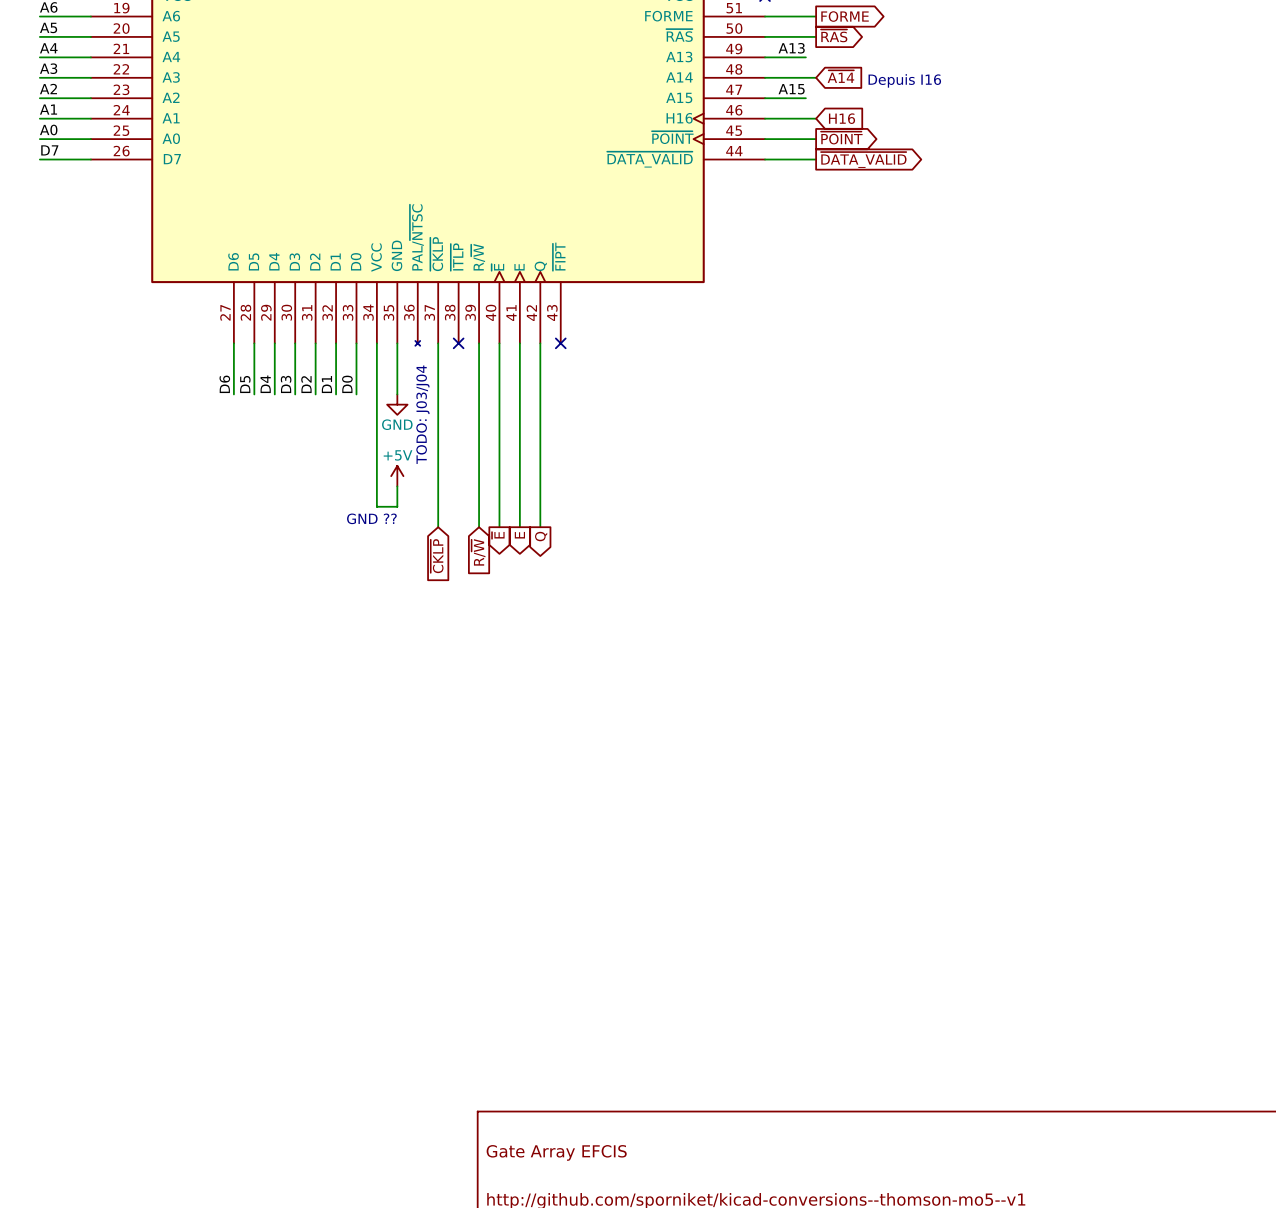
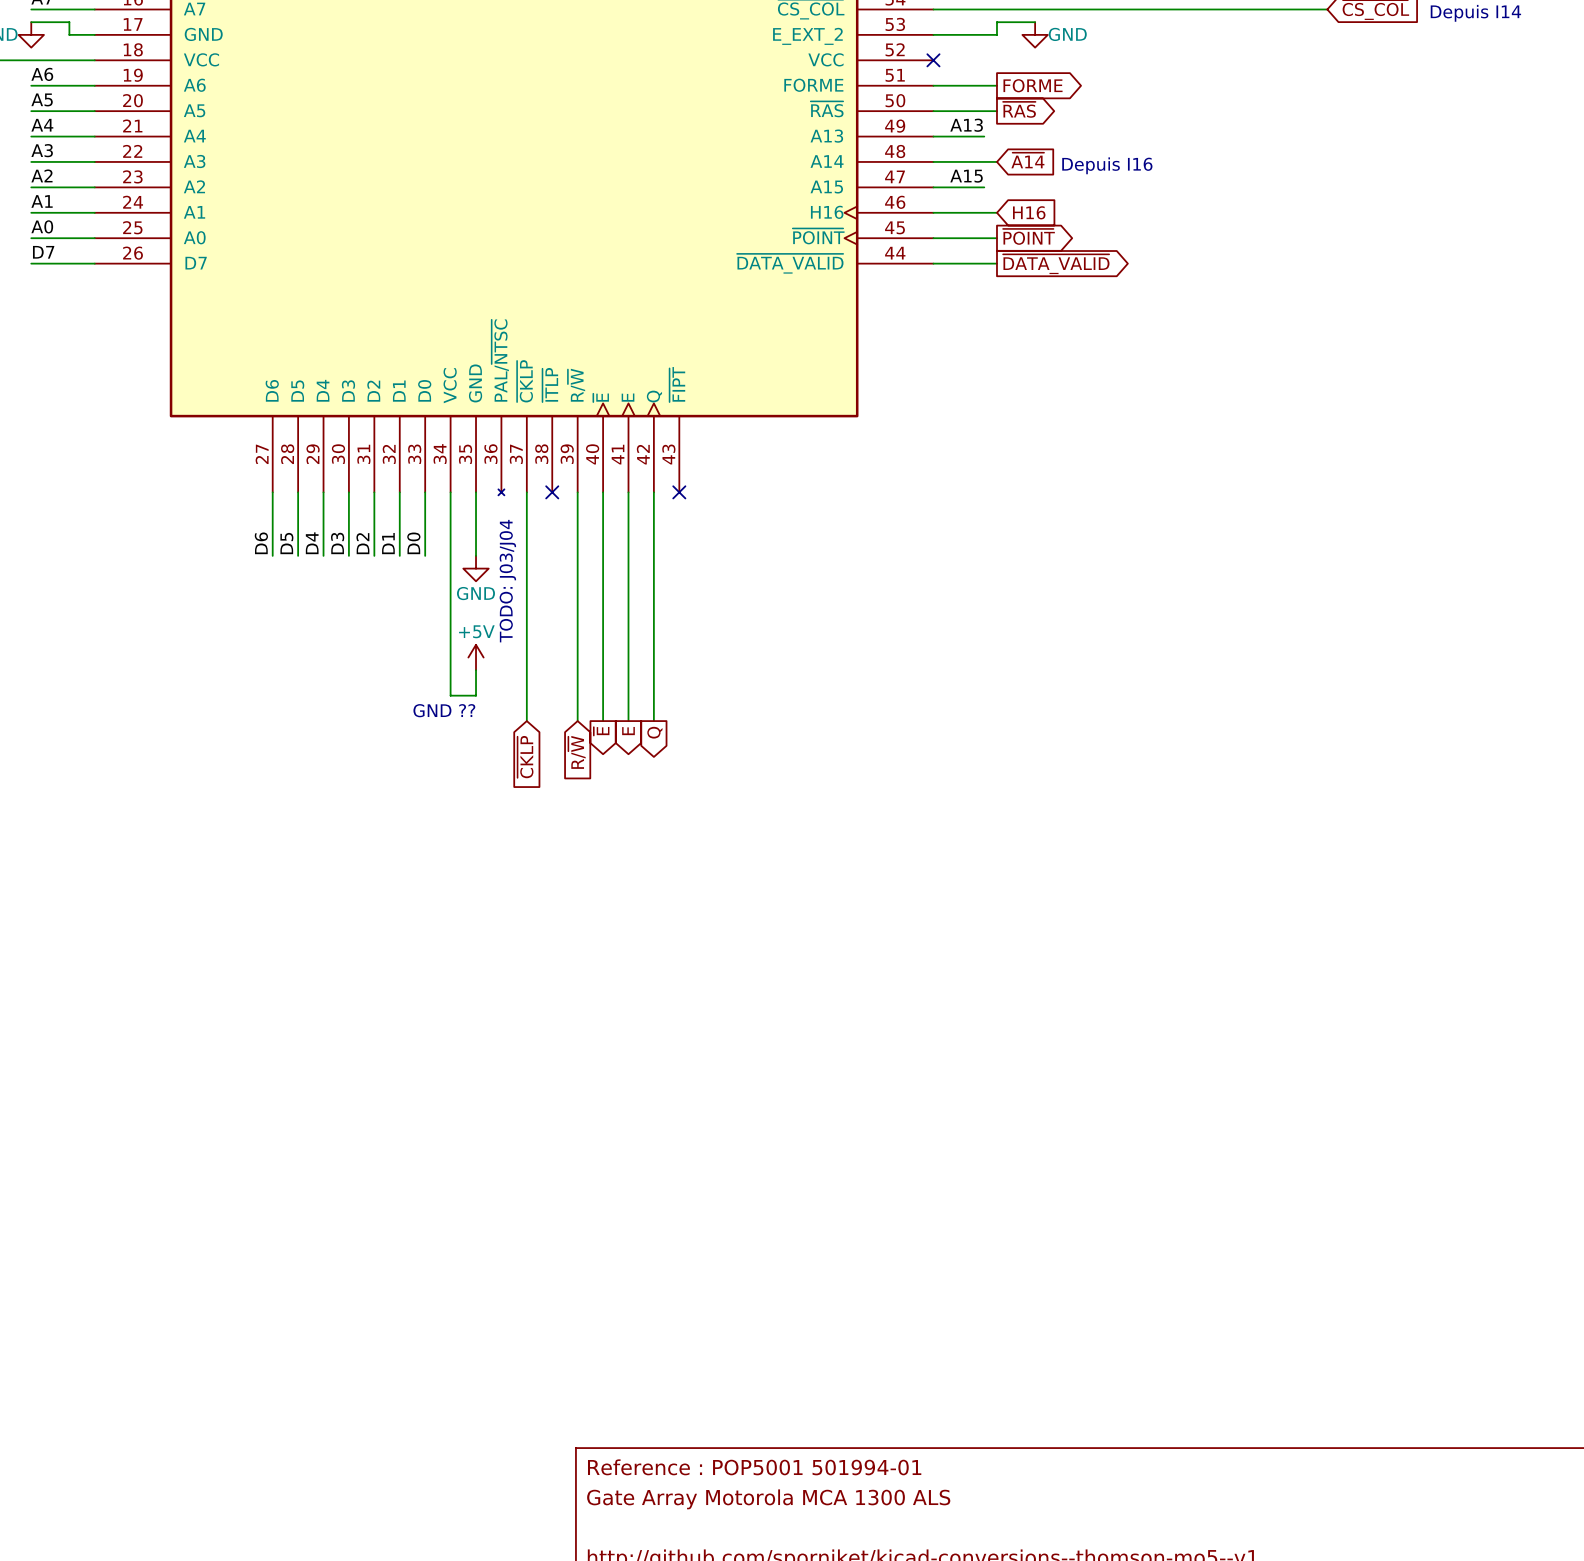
title block: none -> Reference : POP5001 501994-01 (754, 1467)
title block: Gate Array EFCIS (556, 1152) -> Gate Array Motorola MCA 1300 ALS (768, 1499)

